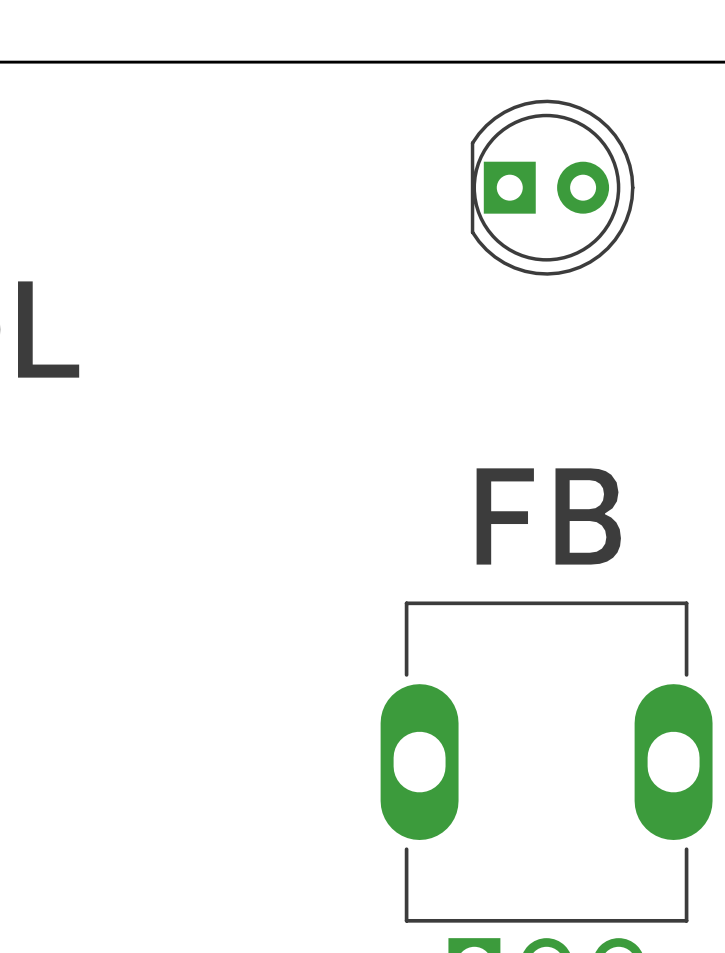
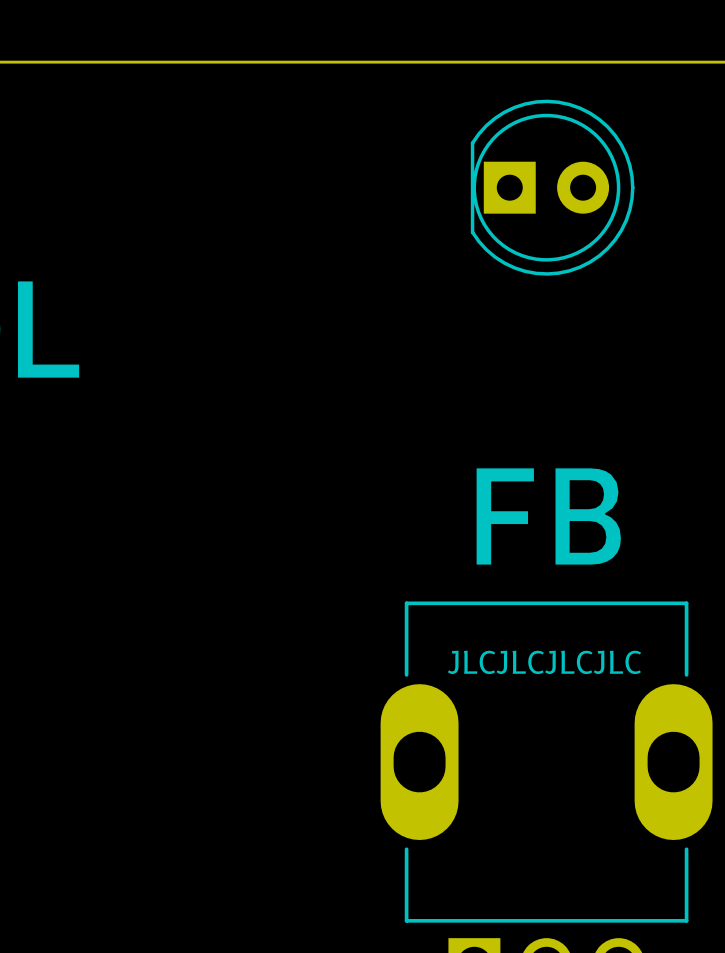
text: none -> JLCJLCJLCJLC (544, 662)

